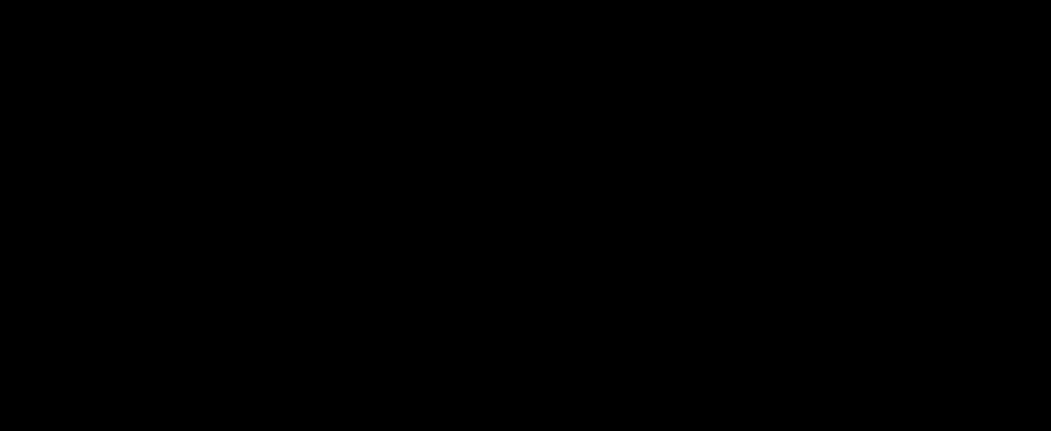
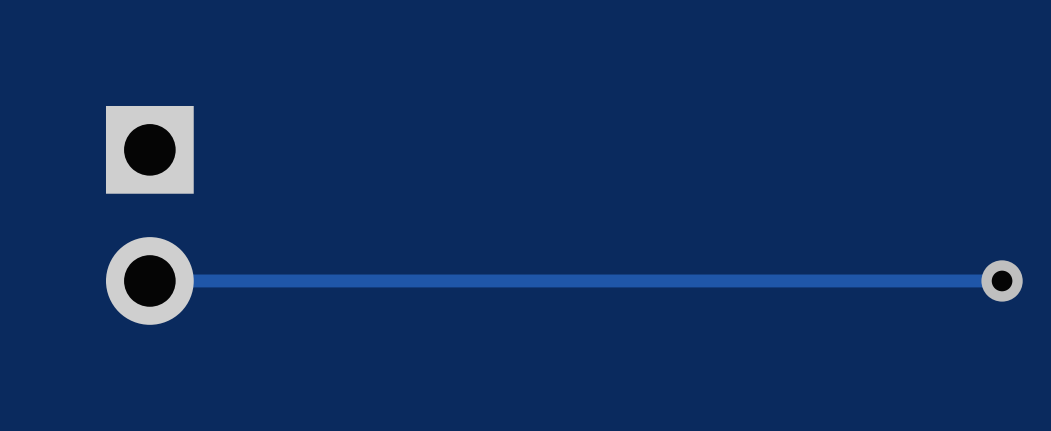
part: none -> (149, 215)
track: none -> (1002, 280) (149, 280)
via: none -> (1002, 280)

